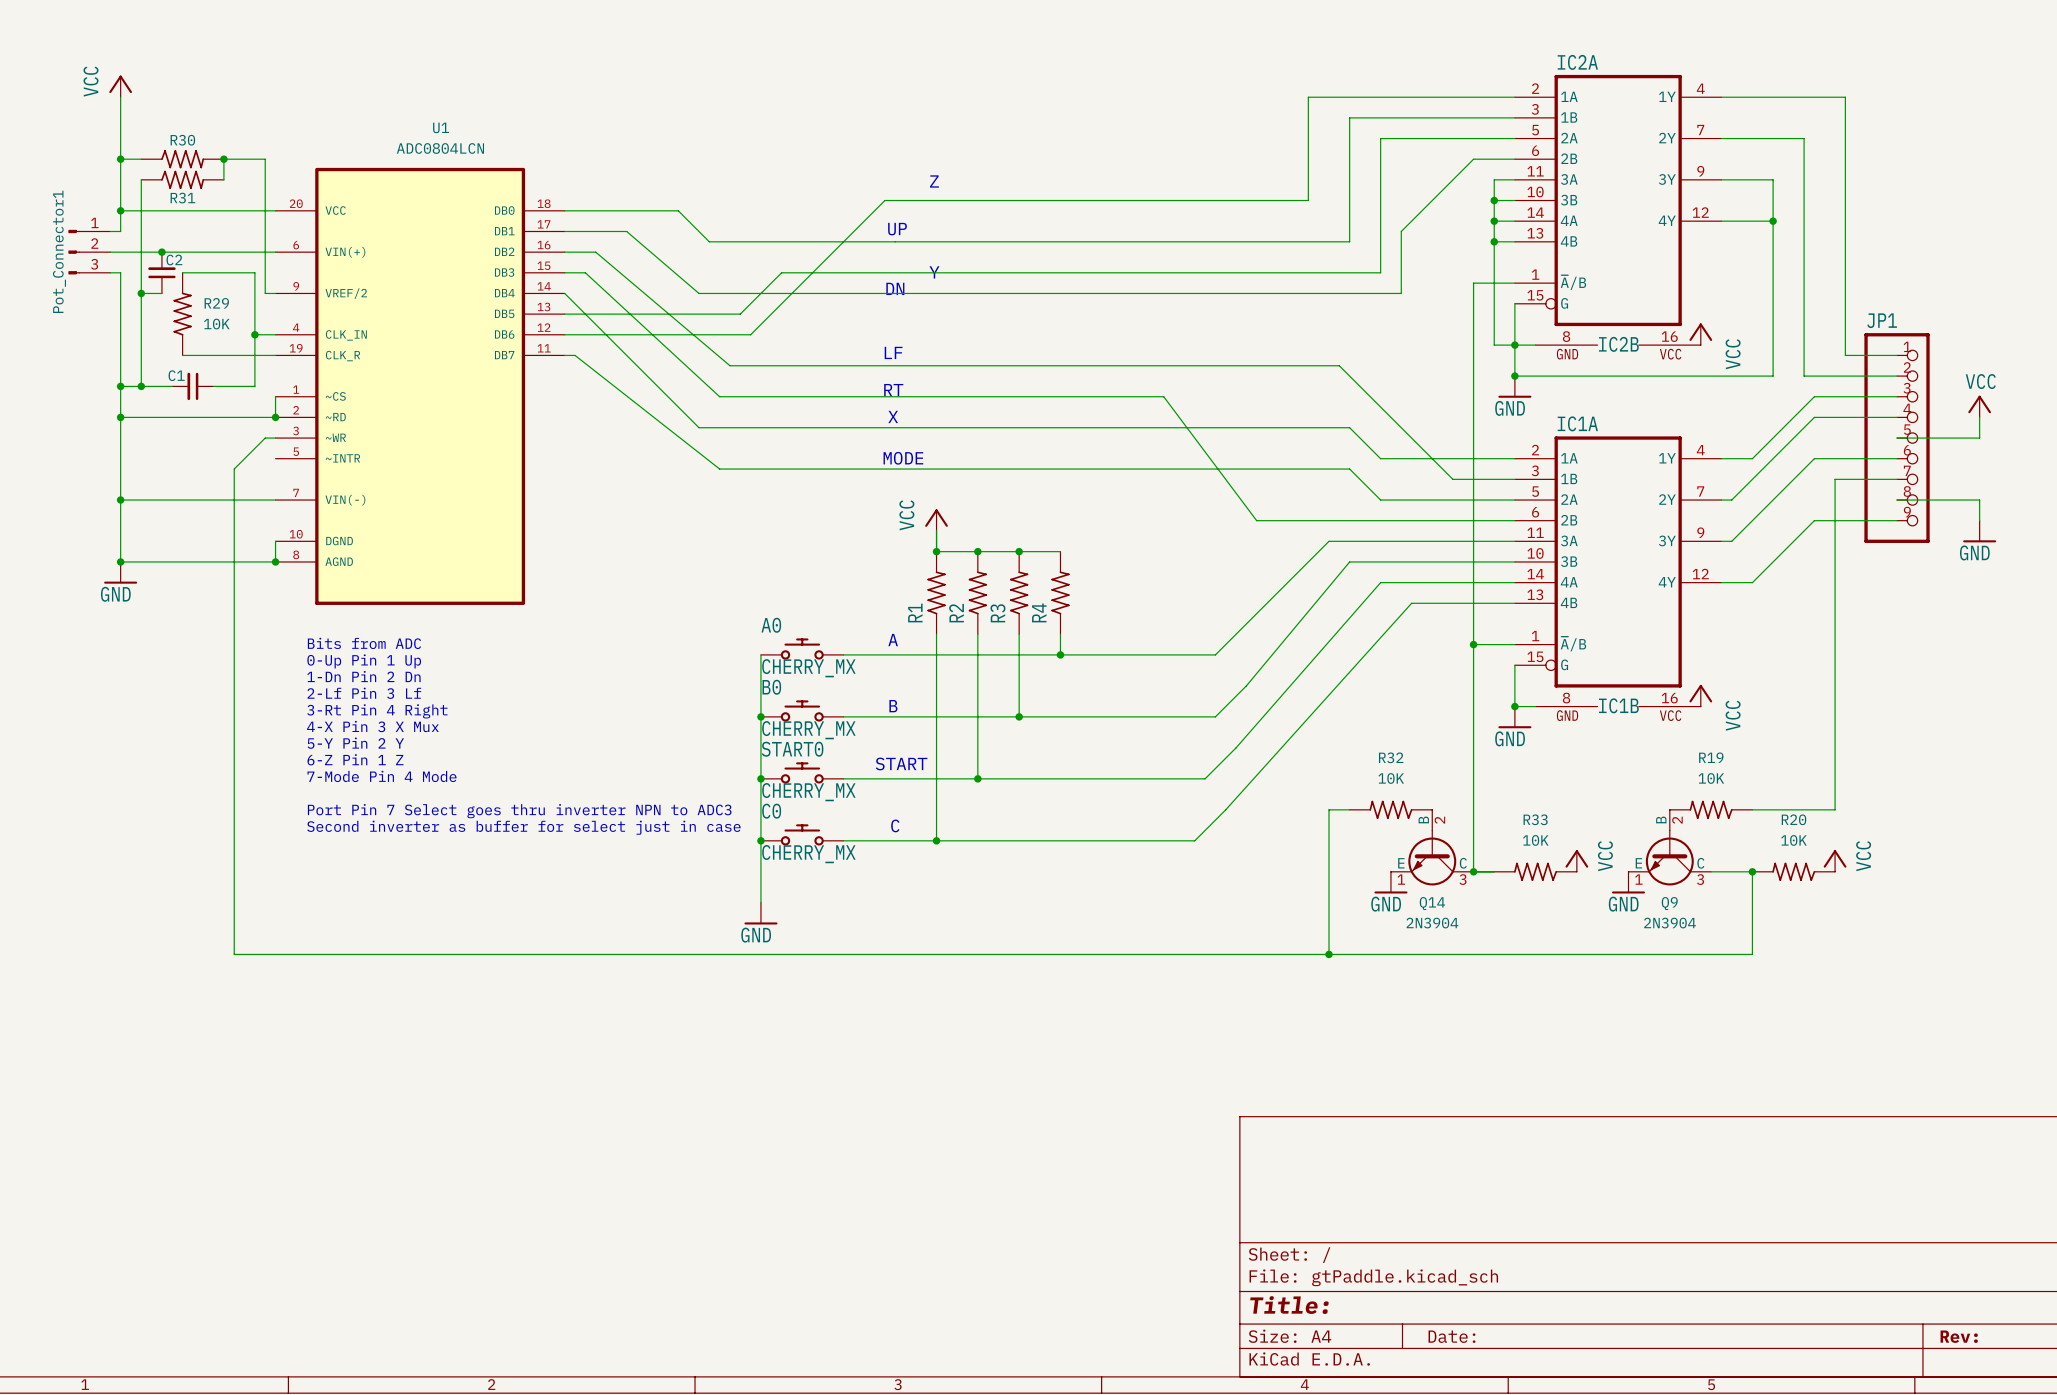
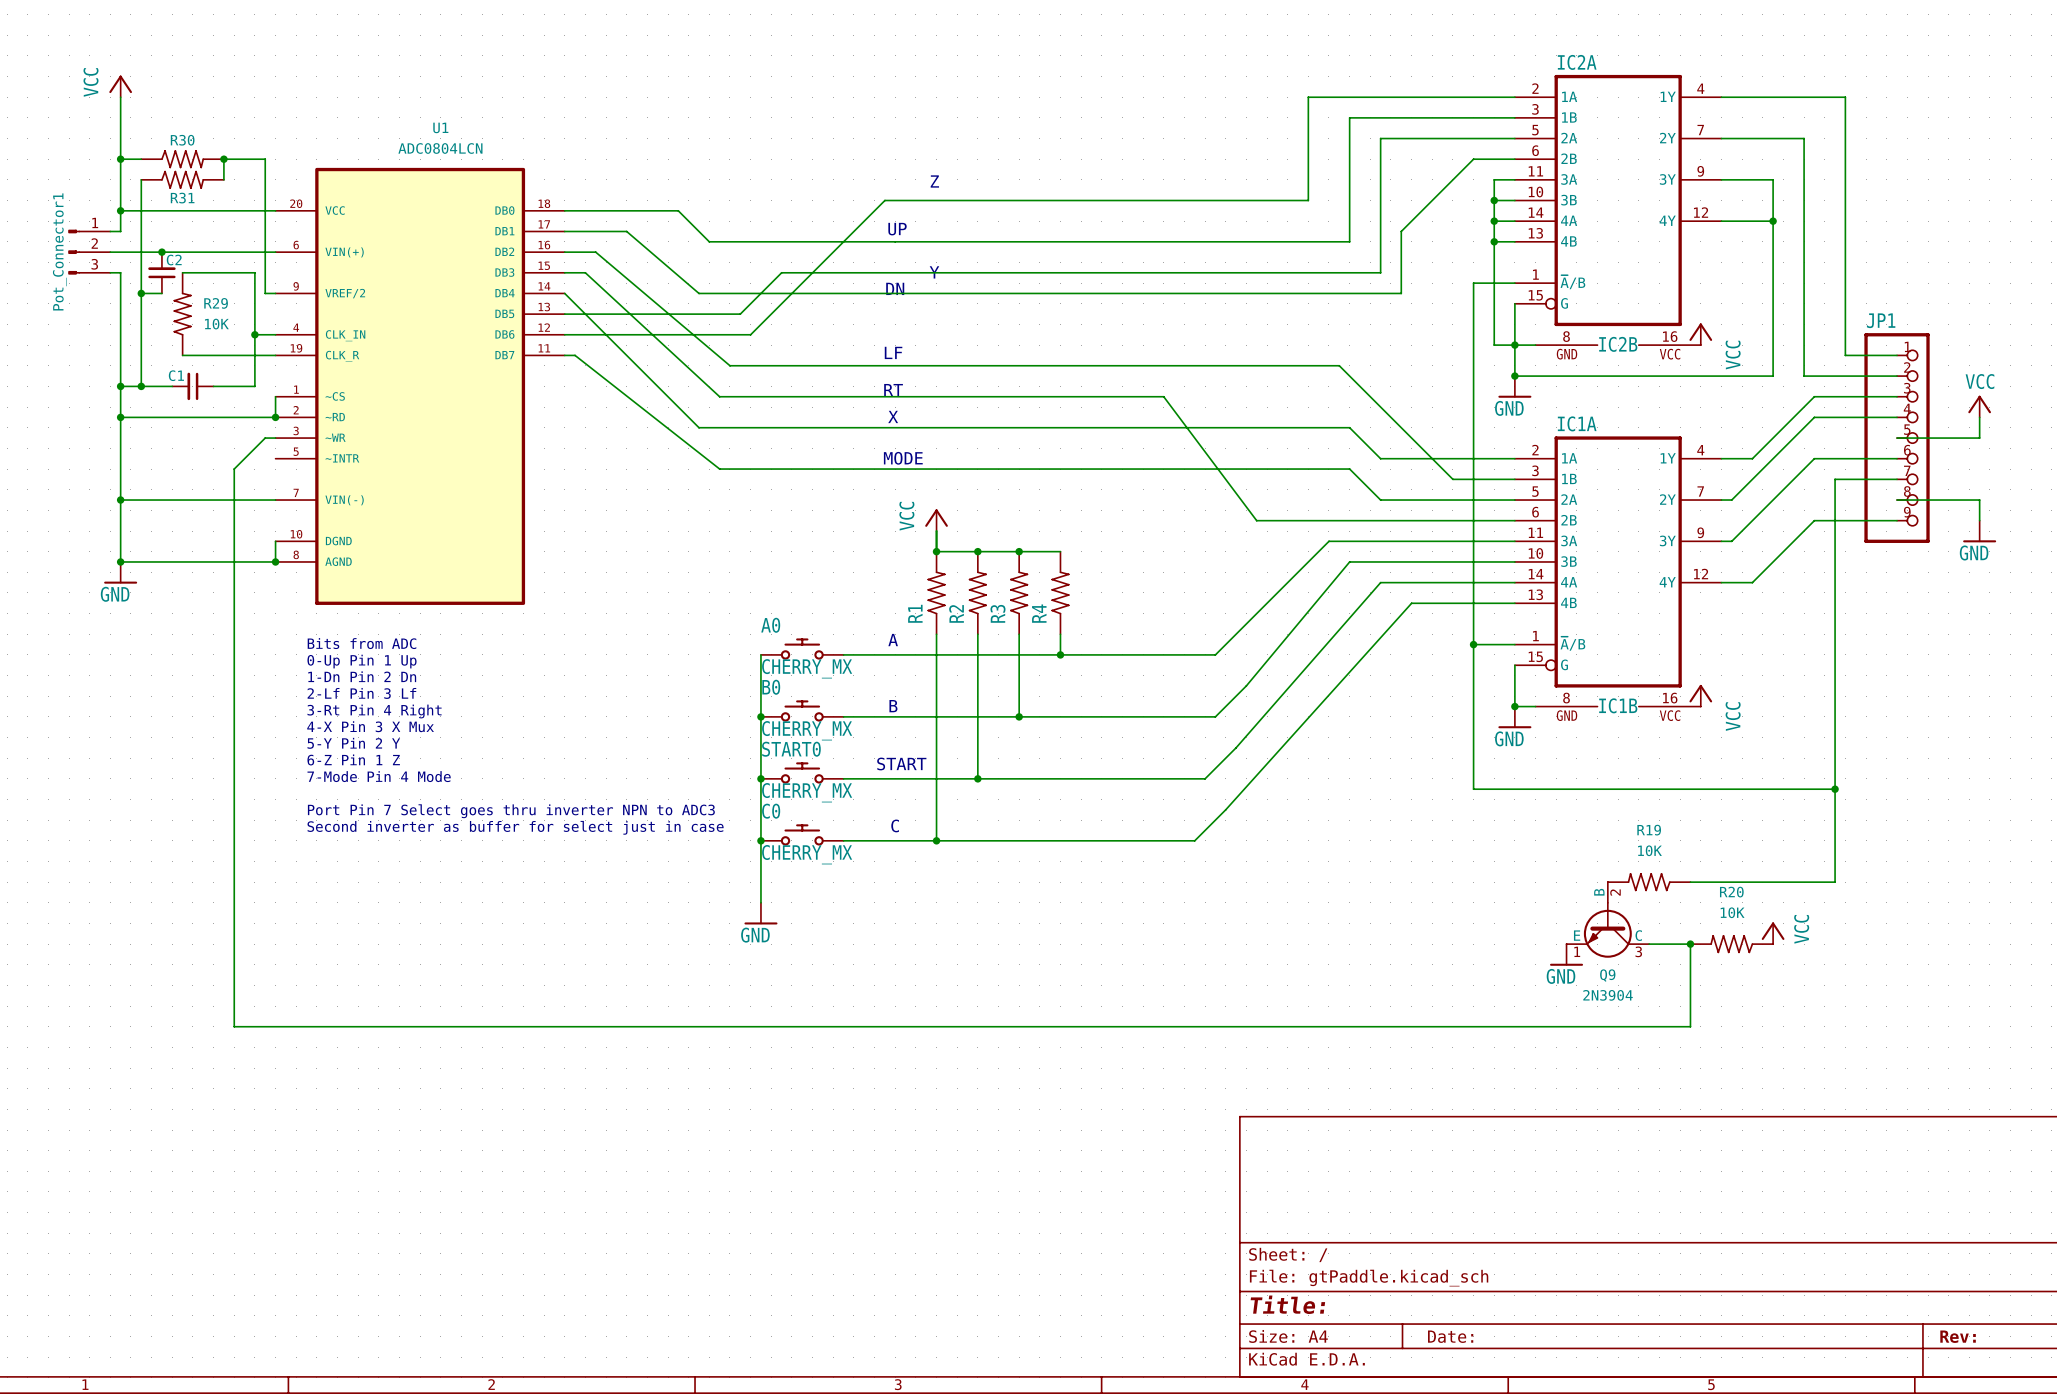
wire: (1473, 789) (1473, 871) (1494, 871) -> (1473, 789) (1835, 789)
junction: none -> (1835, 789)
wire: (1349, 809) (1328, 809) (1328, 954) -> none
R32: 10K (1390, 809) -> none
R19 position: (1711, 809) -> (1649, 882)
wire: (1752, 809) (1835, 809) -> (1690, 882) (1835, 882) (1835, 809)
Q14: 2N3904 (1432, 847) -> none
Q9 position: (1669, 847) -> (1607, 919)
power symbol: VCC (1576, 860) -> none
power symbol position: VCC (1835, 860) -> VCC (1773, 933)
junction: (1473, 871) -> none
R33: 10K (1535, 871) -> none
wire: (1711, 871) (1752, 871) (1752, 954) (234, 954) -> (1649, 944) (1690, 944) (1690, 1026) (234, 1026) (234, 954)
junction: (1752, 871) -> none
R20 position: (1793, 871) -> (1731, 944)
power symbol: GND (1390, 882) -> none
power symbol: GND (1628, 882) -> none
junction: none -> (1690, 944)
junction: (1328, 954) -> none
power symbol: none -> GND (1566, 954)

